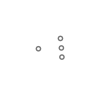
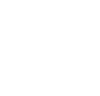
via: (60, 38) -> none
via: (61, 47) -> none
via: (38, 48) -> none
via: (61, 57) -> none

